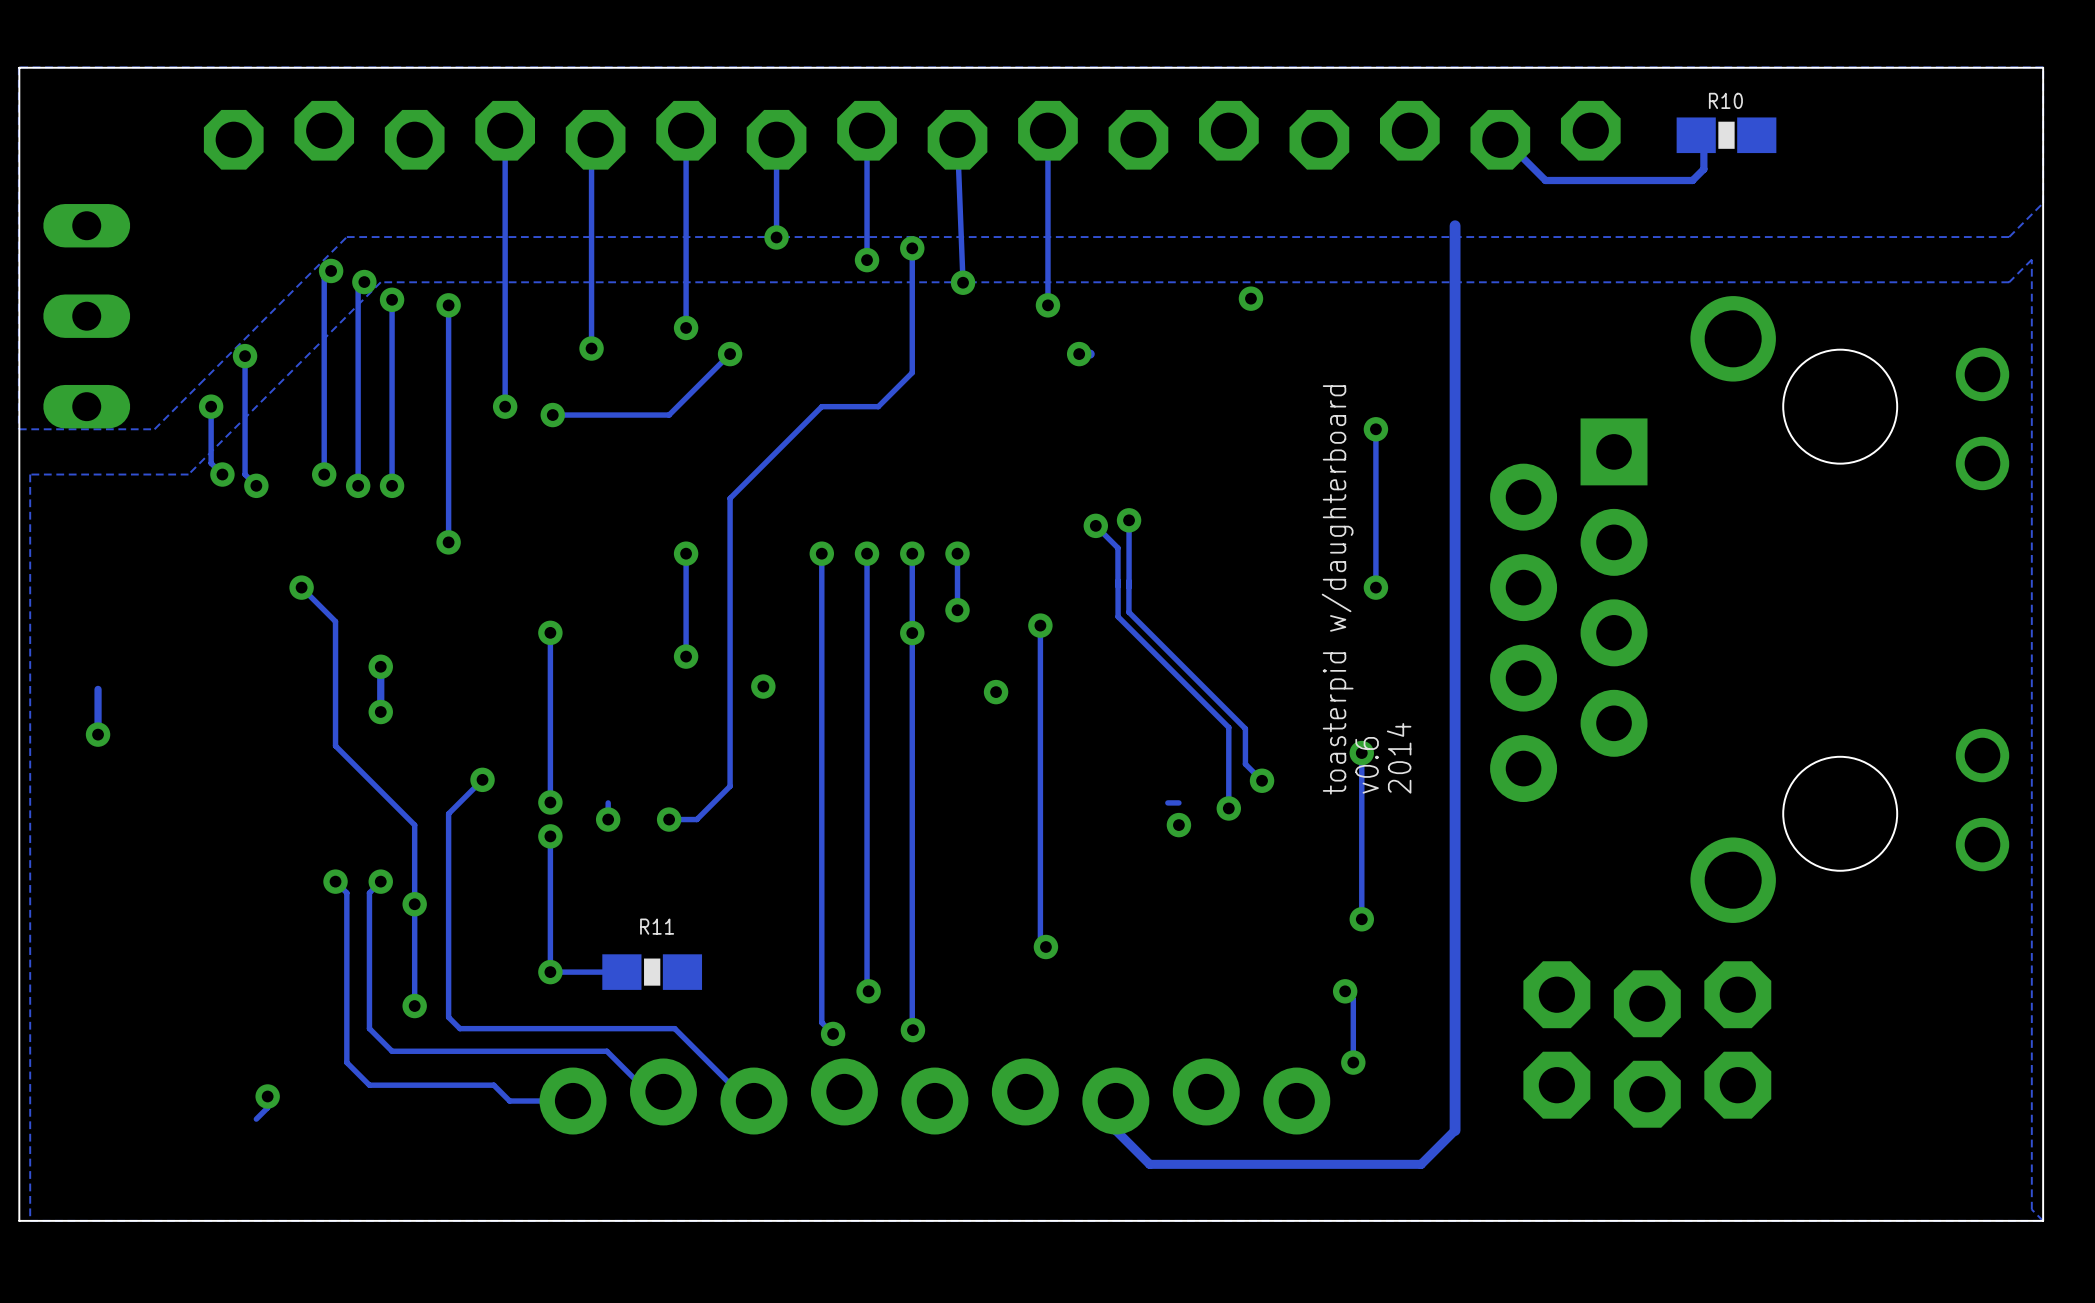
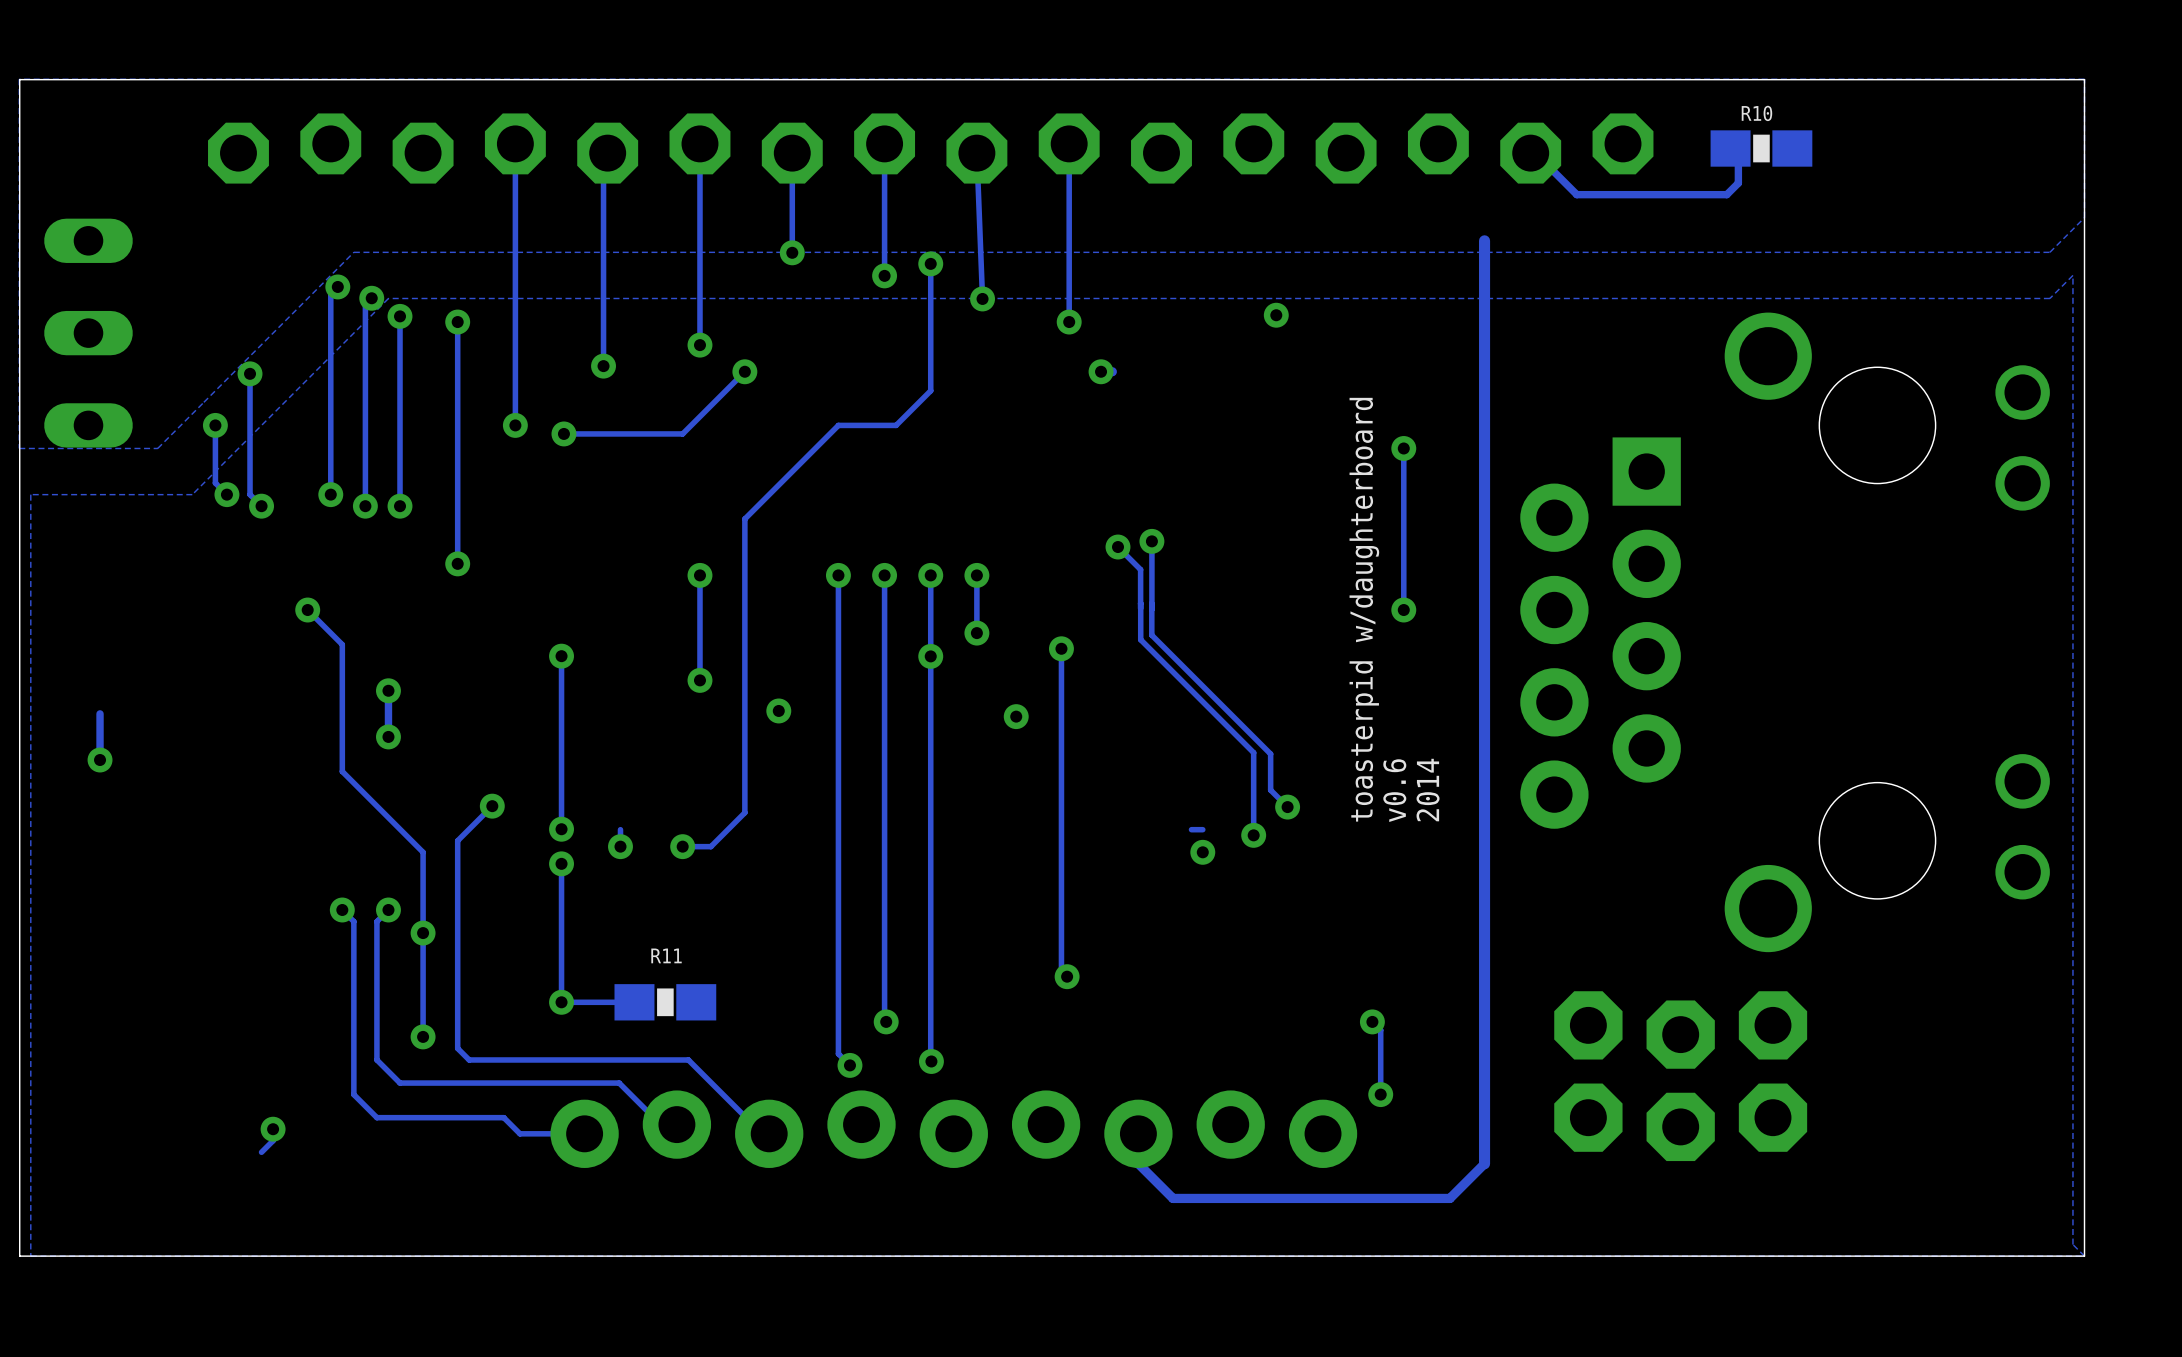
track: (1361, 753) (1361, 919) -> none
via: (1361, 753) -> none
via: (1361, 919) -> none

